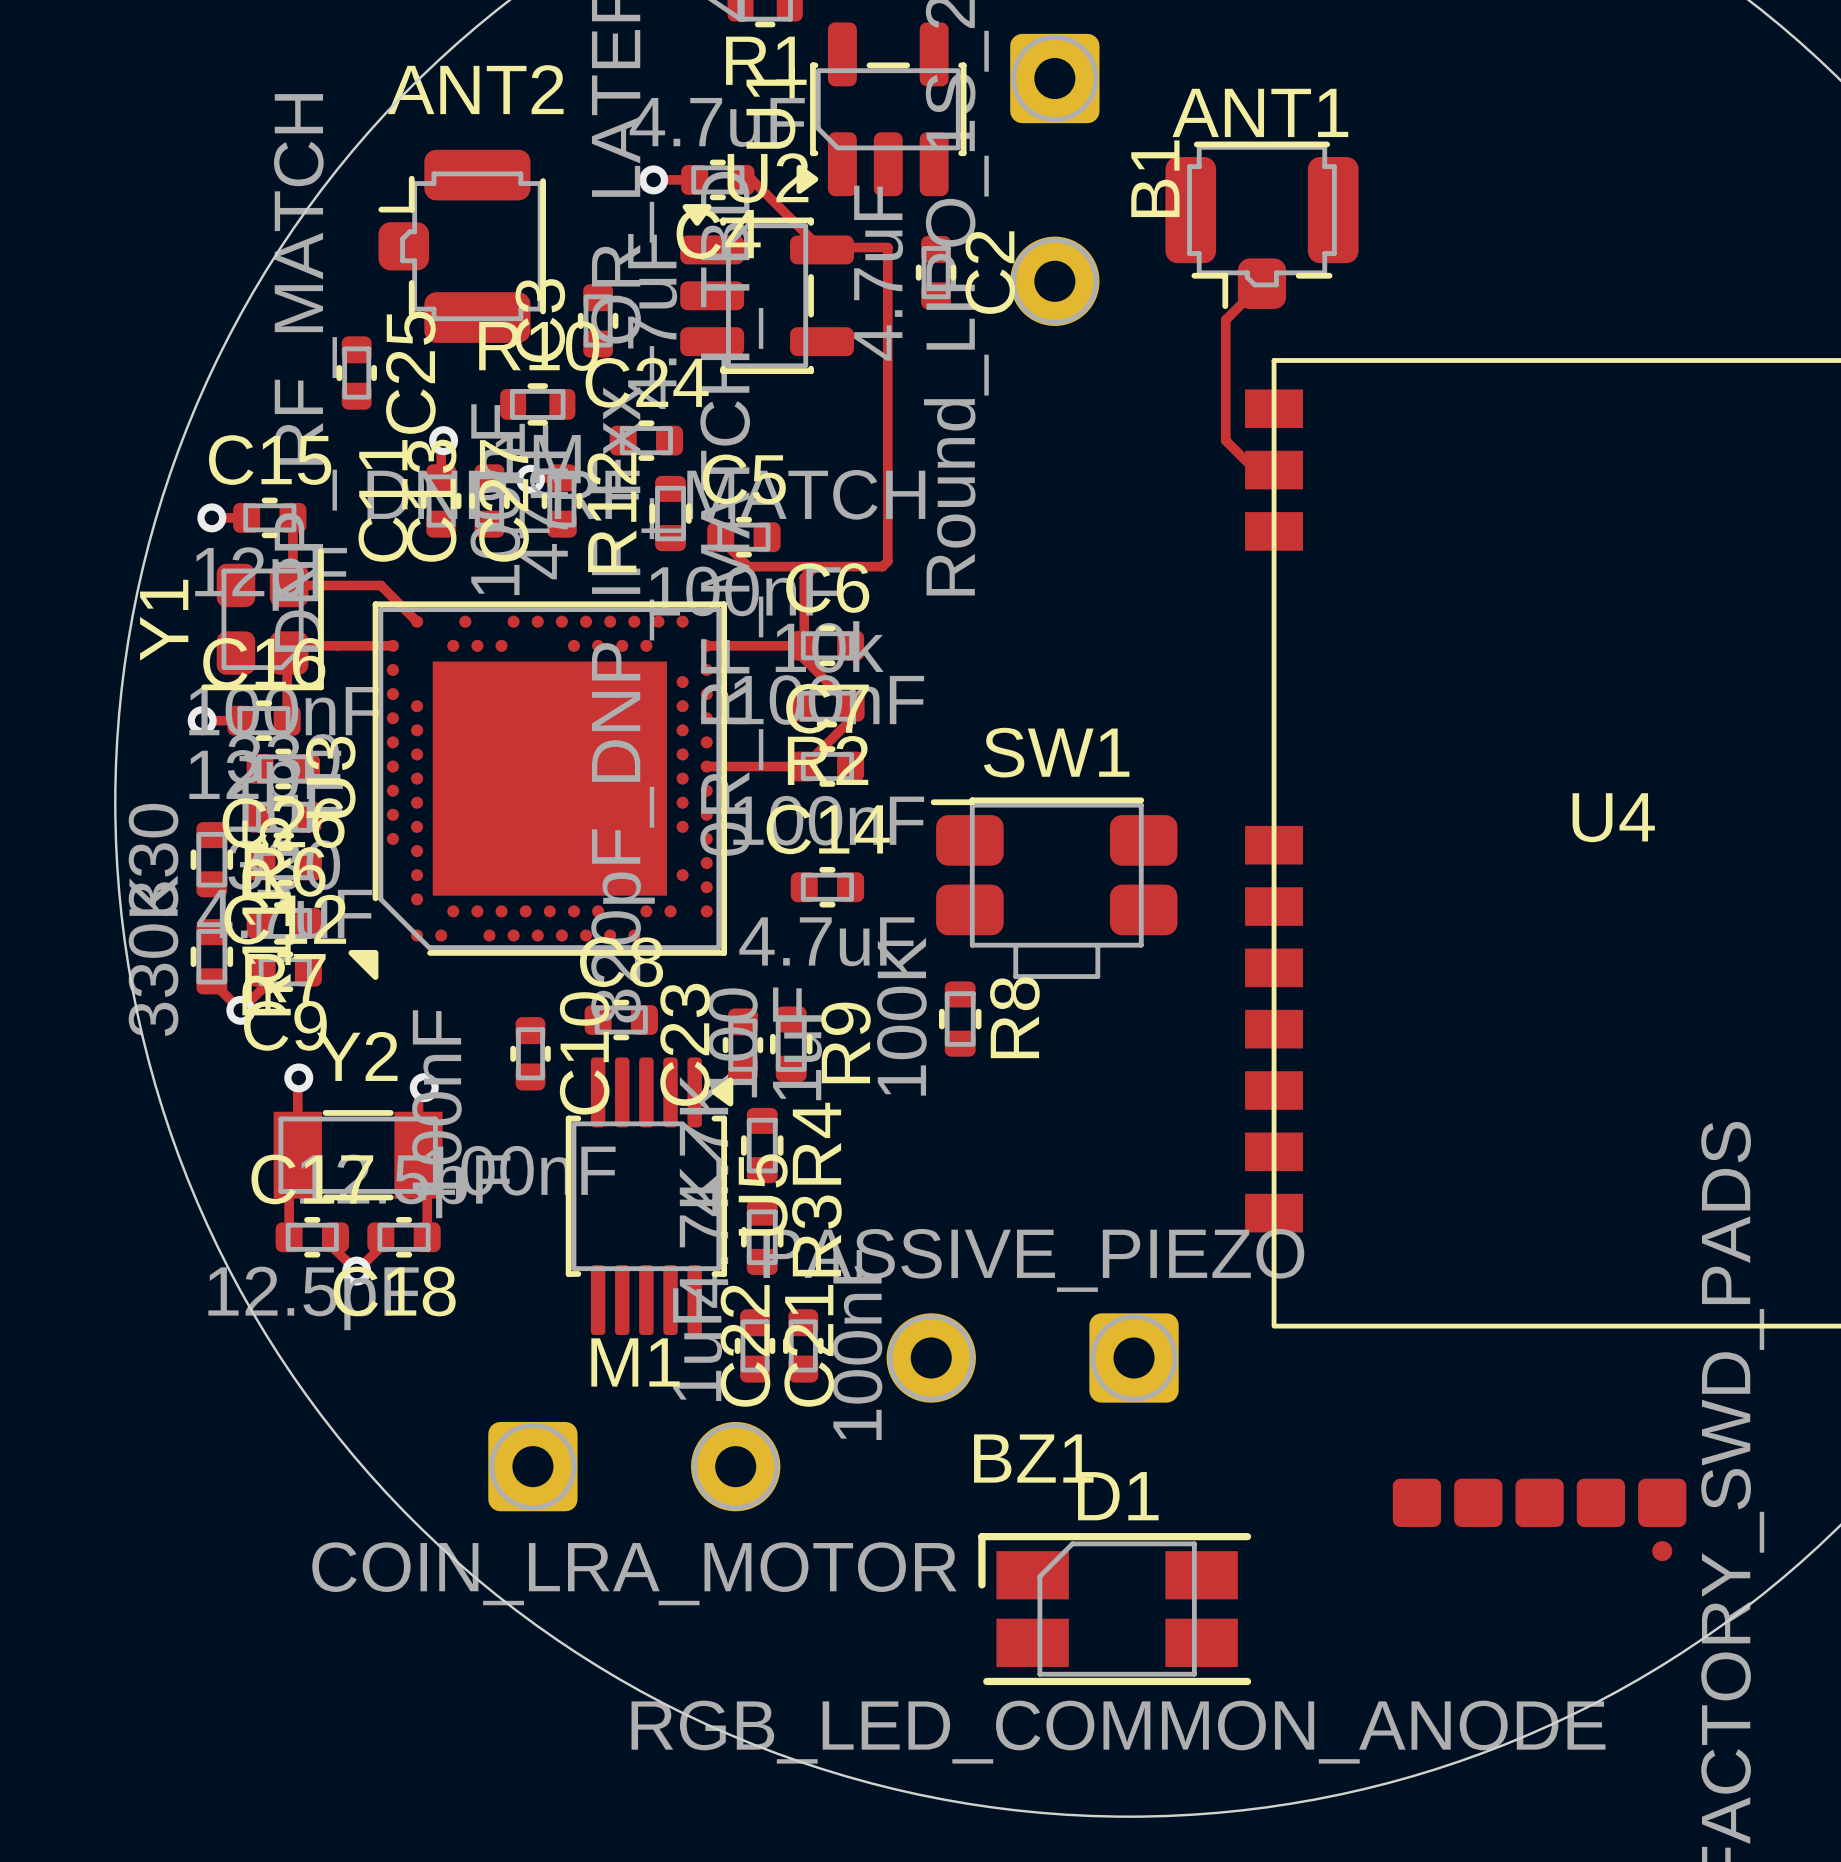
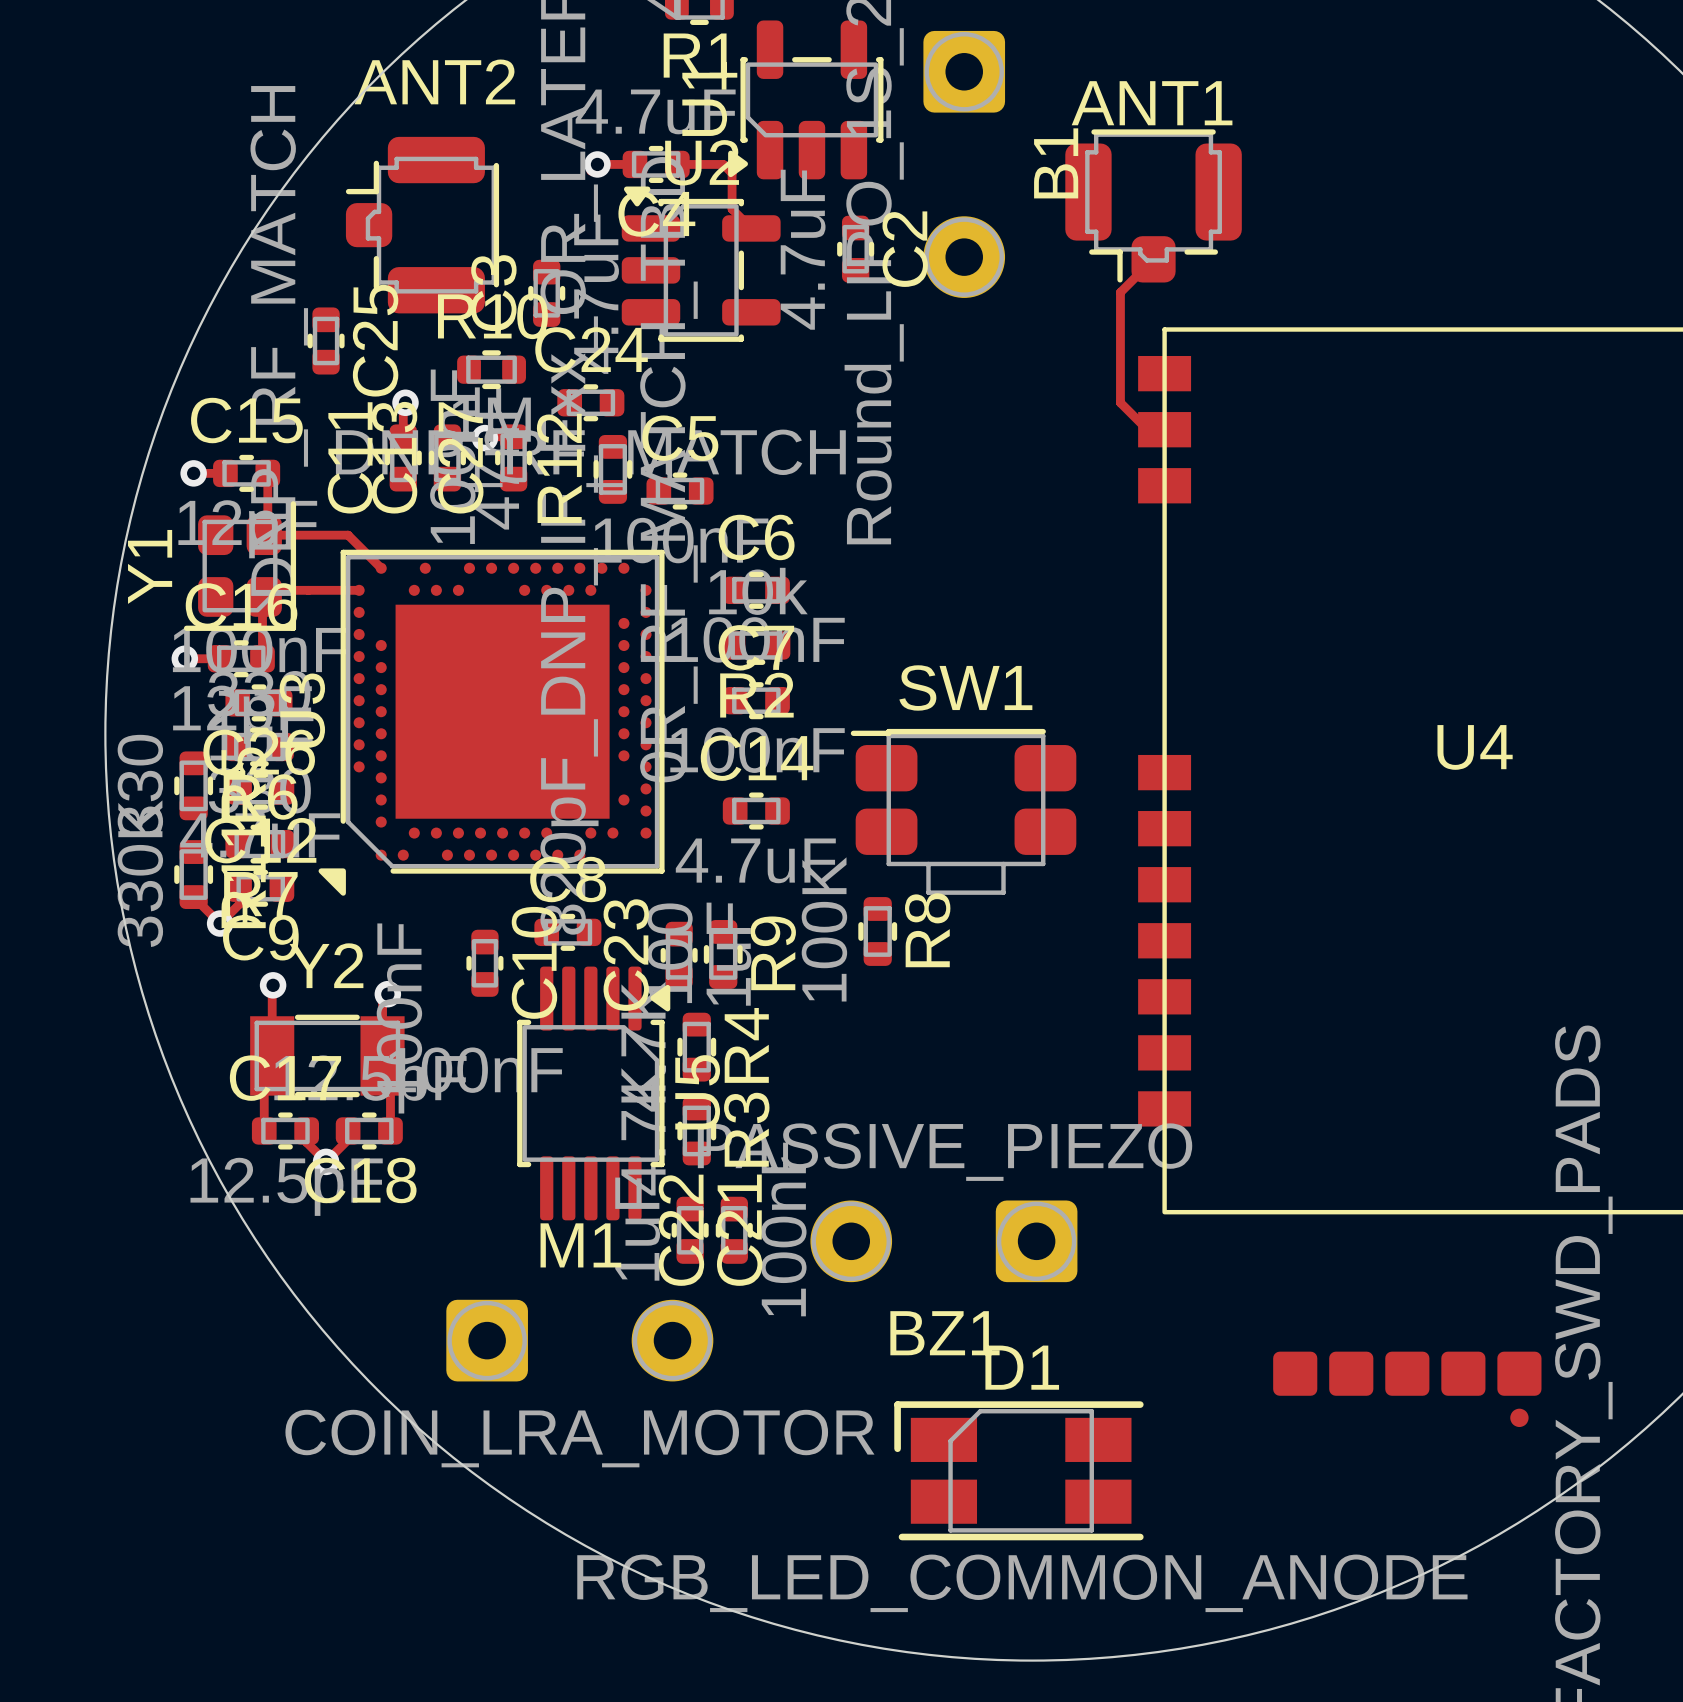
track: (752, 179) (800, 228) -> (687, 164) (723, 164) (732, 173) (732, 209)
track: (822, 249) (824, 247) (887, 247) (887, 561) (882, 566) (748, 566) (720, 537) -> none
track: (815, 566) (804, 577) (804, 658) (851, 706) (851, 719) (804, 766) (706, 766) -> none
track: (706, 645) (804, 645) -> none

